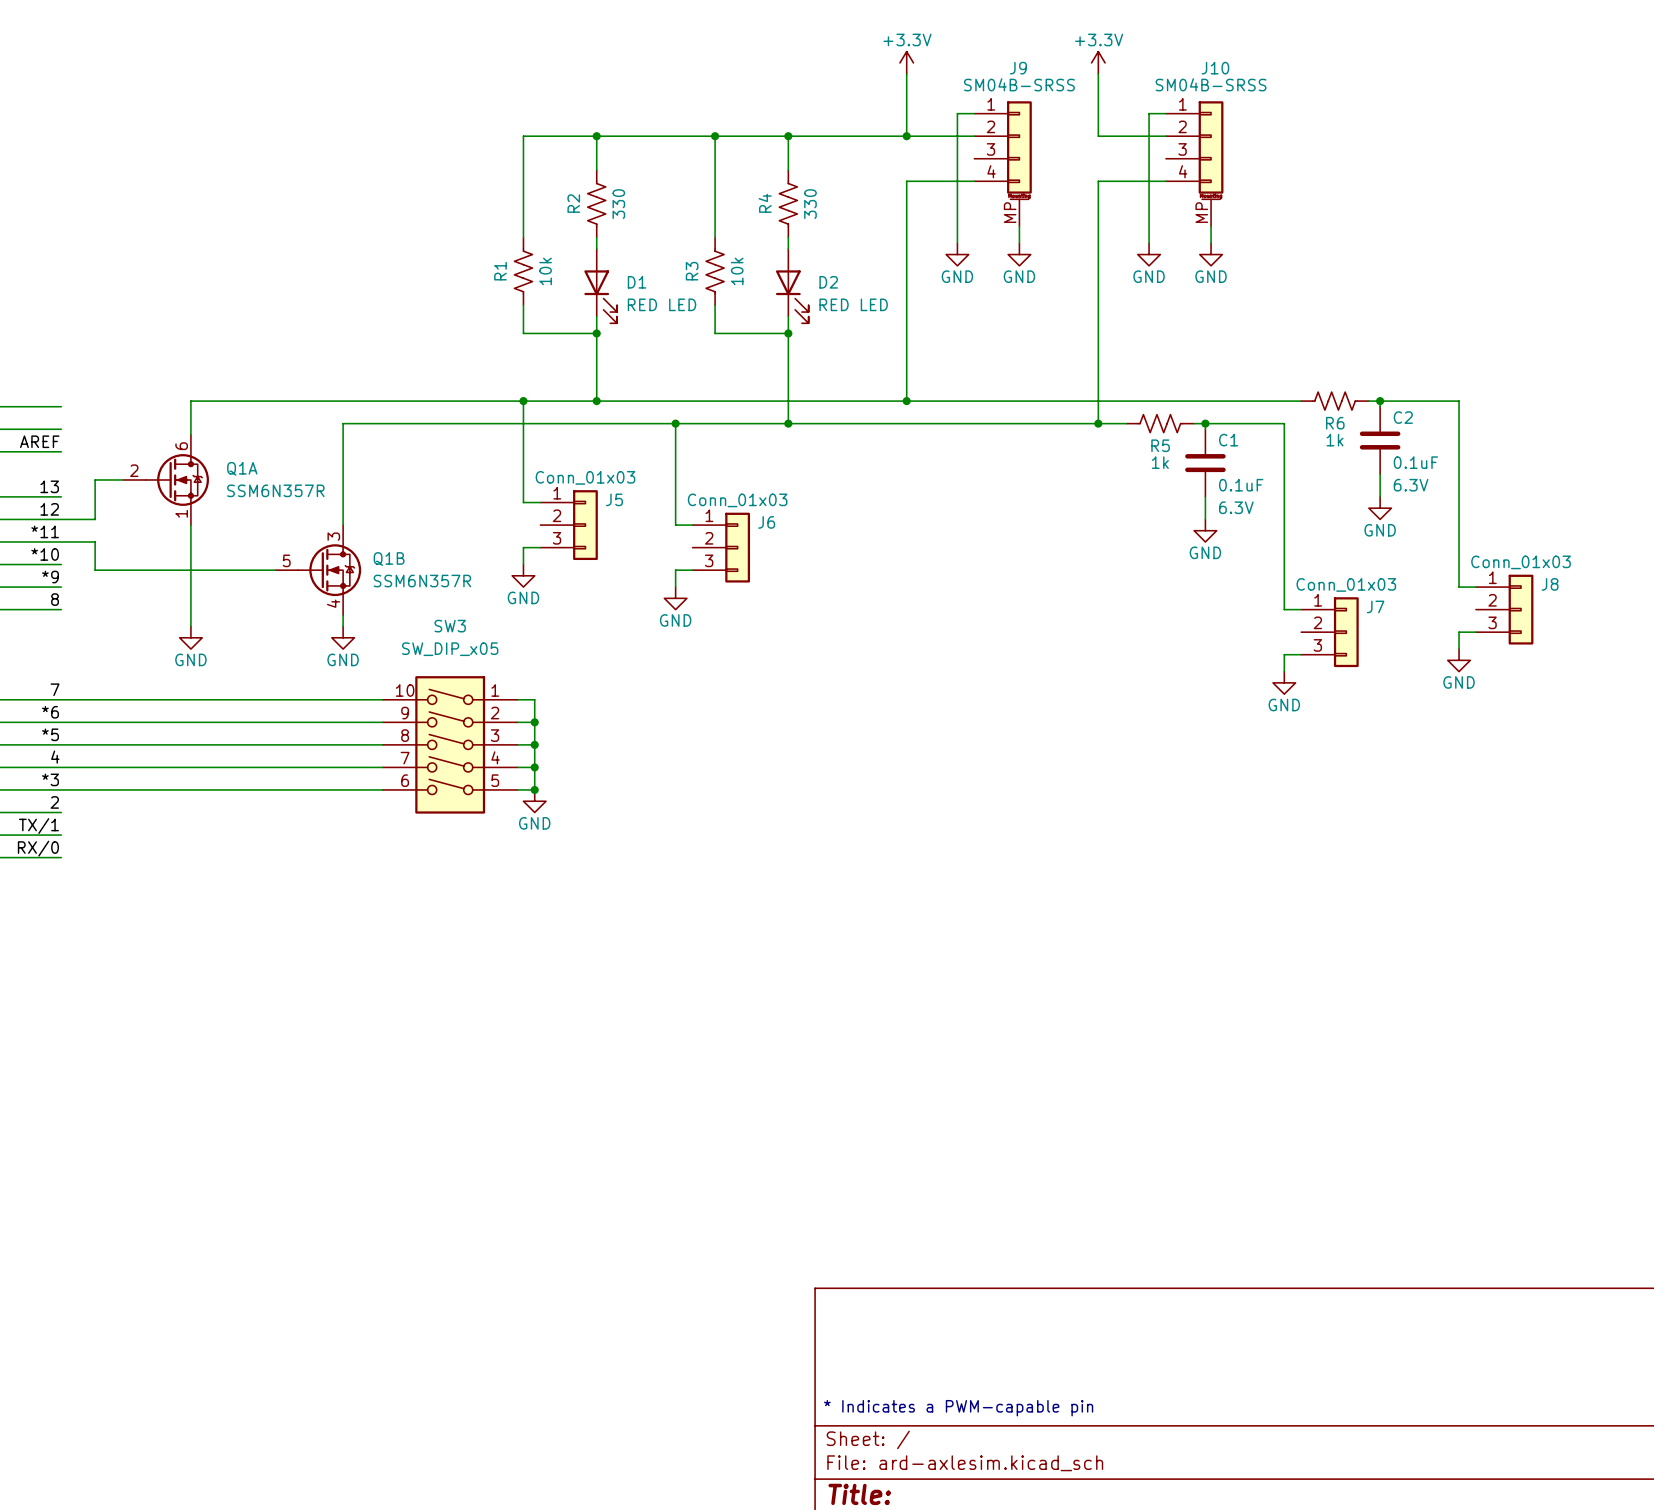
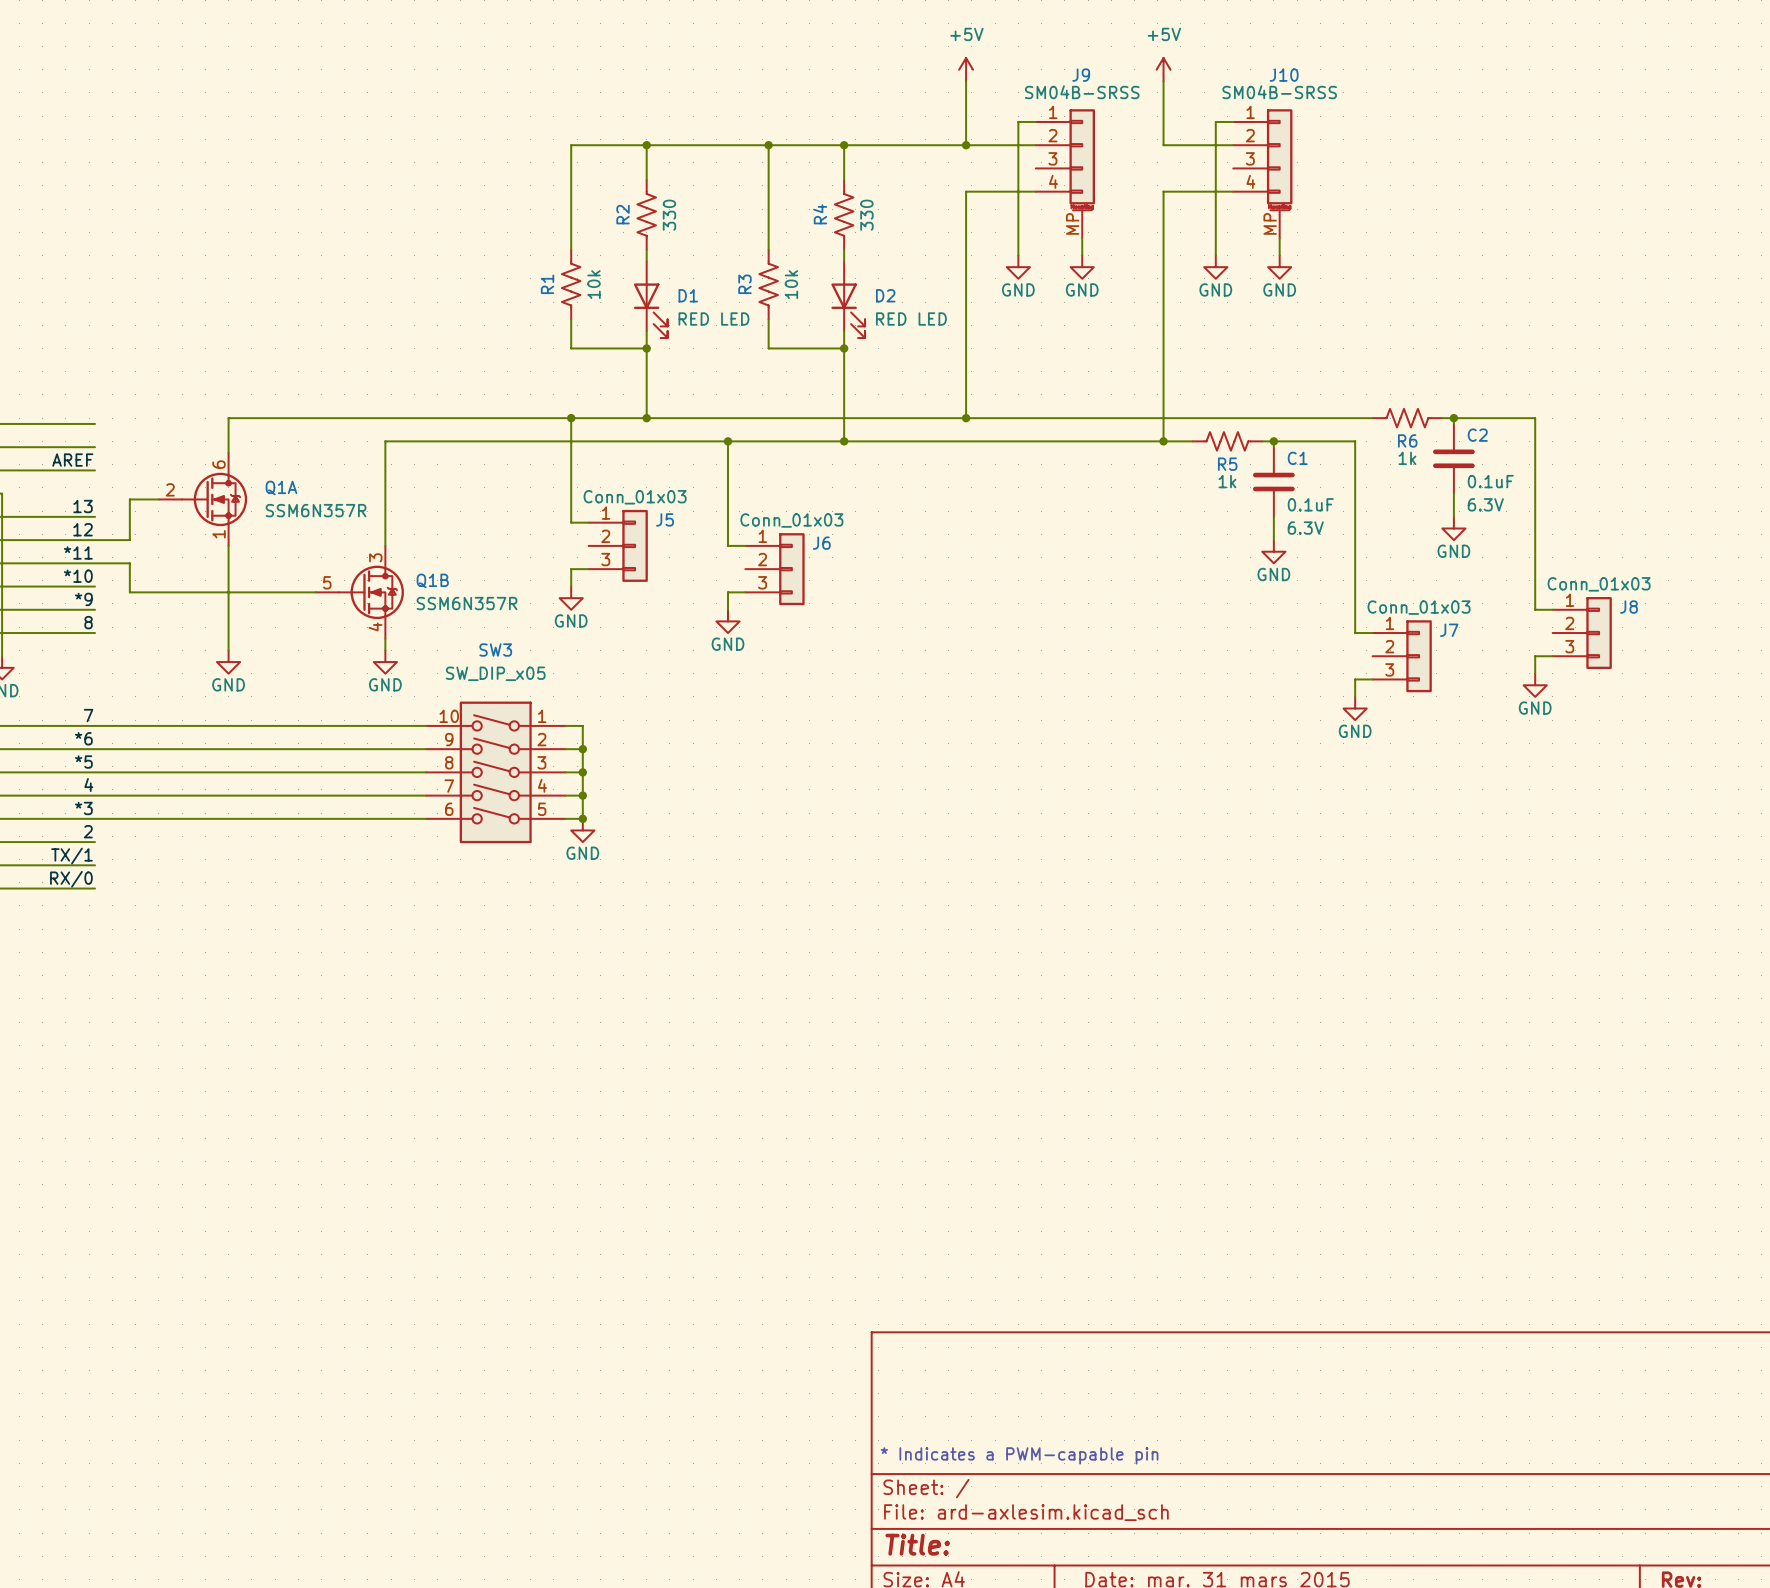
power symbol: +3.3V (906, 62) -> +5V (966, 69)
power symbol: +3.3V (1098, 62) -> +5V (1163, 69)

